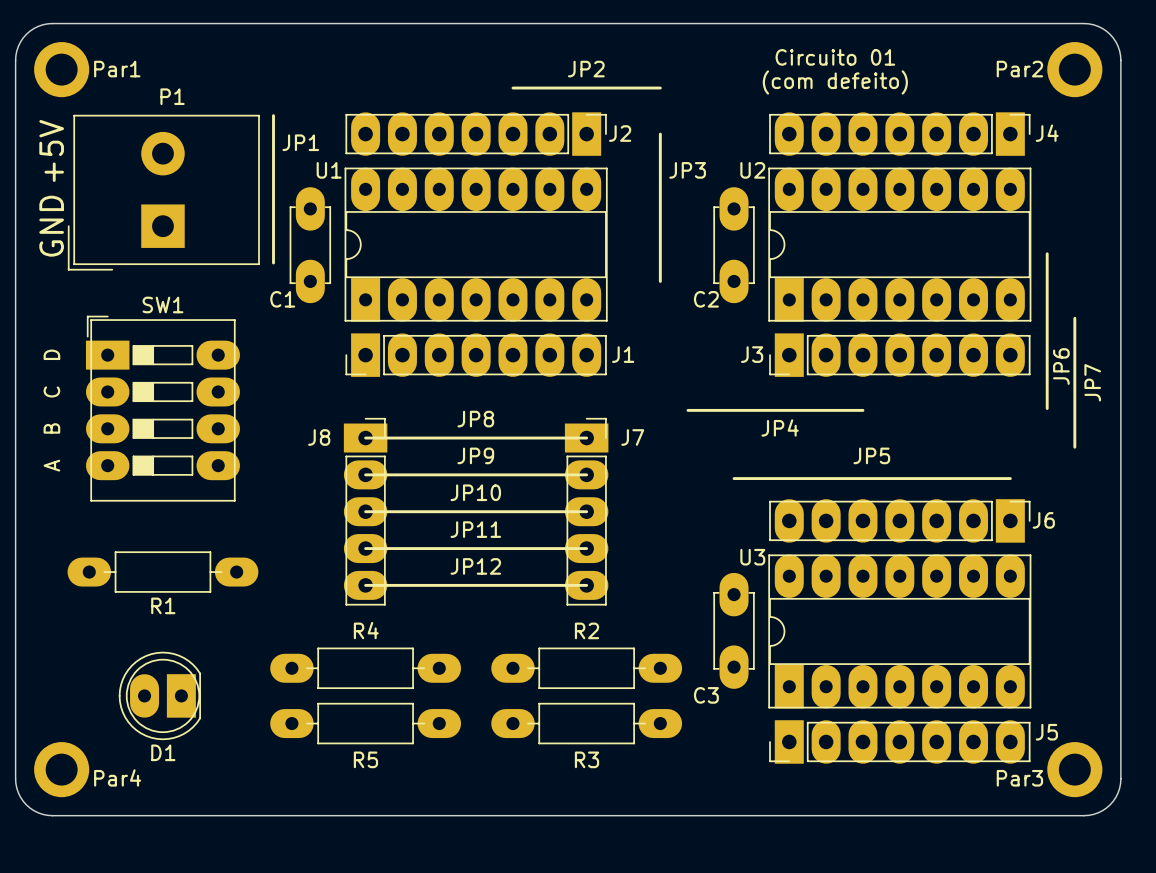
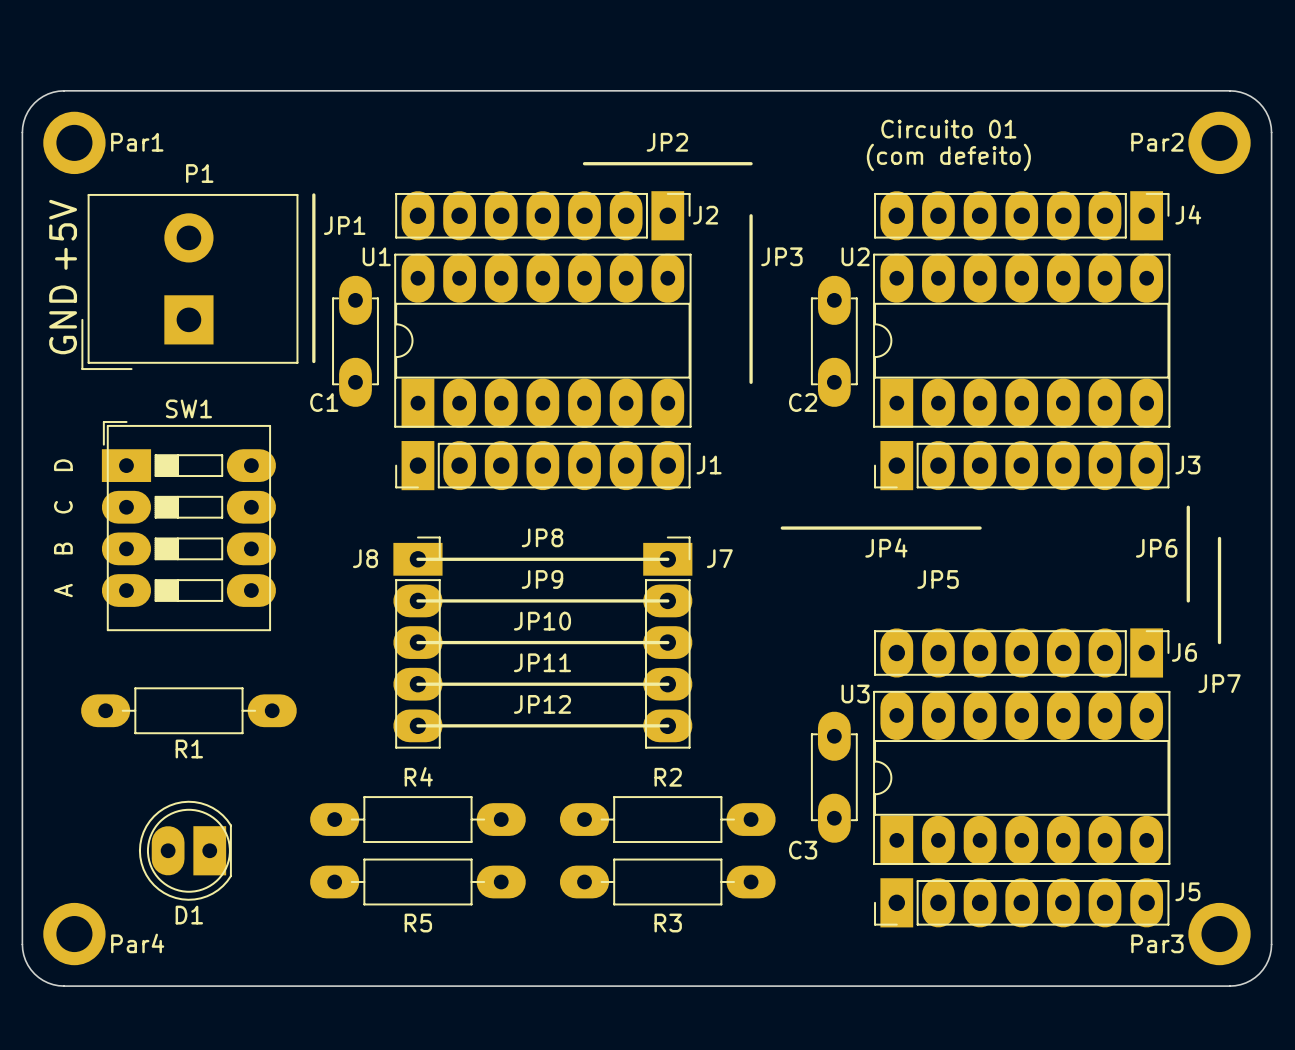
line: (1047, 253) (1047, 391) -> none
line: (1074, 318) (1074, 419) -> none
J3 name position: J3 (752, 354) -> J3 (1187, 464)
text rotation: 0° (1061, 366) -> 90° clockwise (1156, 548)
text position: JP6 (1061, 366) -> JP6 (1156, 548)
text rotation: 0° (1092, 382) -> 90° clockwise (1219, 683)
text position: JP7 (1092, 382) -> JP7 (1219, 683)
line: none -> (1188, 525) (1188, 600)
line: none -> (1219, 569) (1219, 642)
text position: JP5 (871, 455) -> JP5 (938, 579)
line: (734, 478) (1010, 478) -> none

